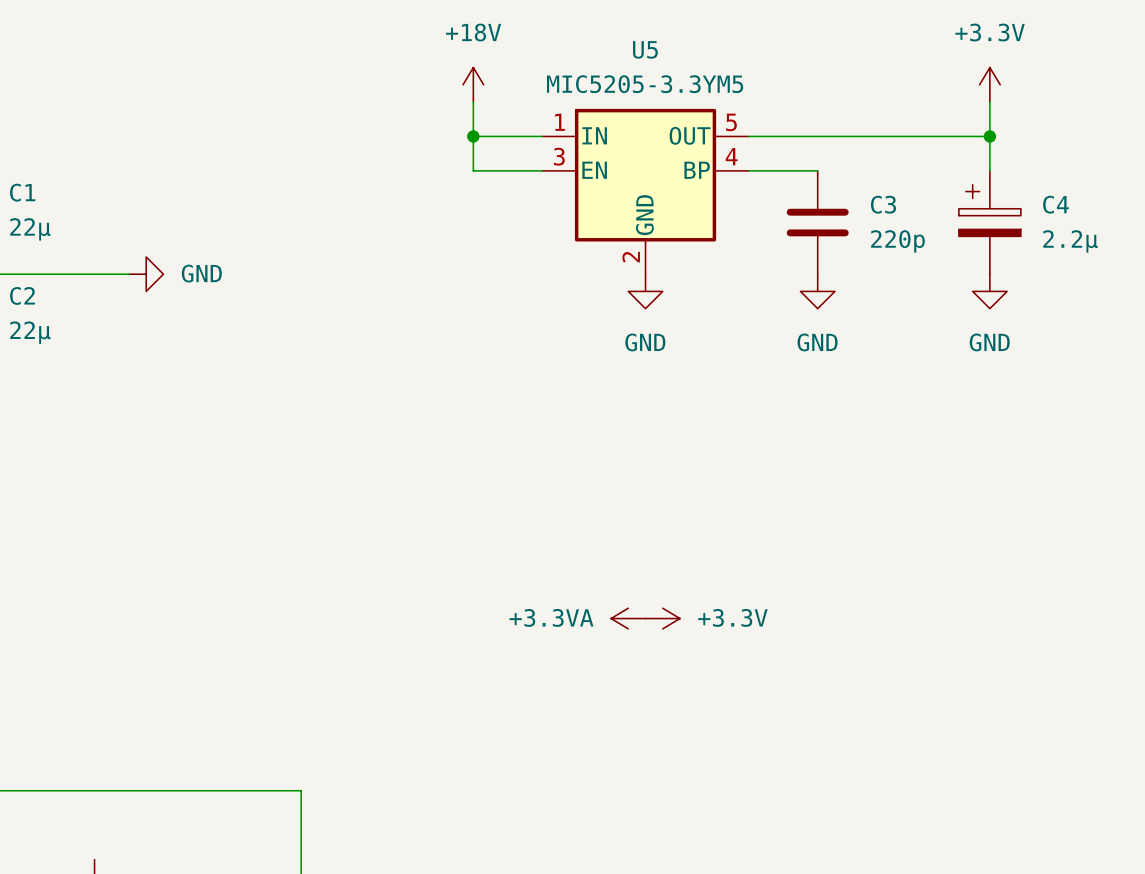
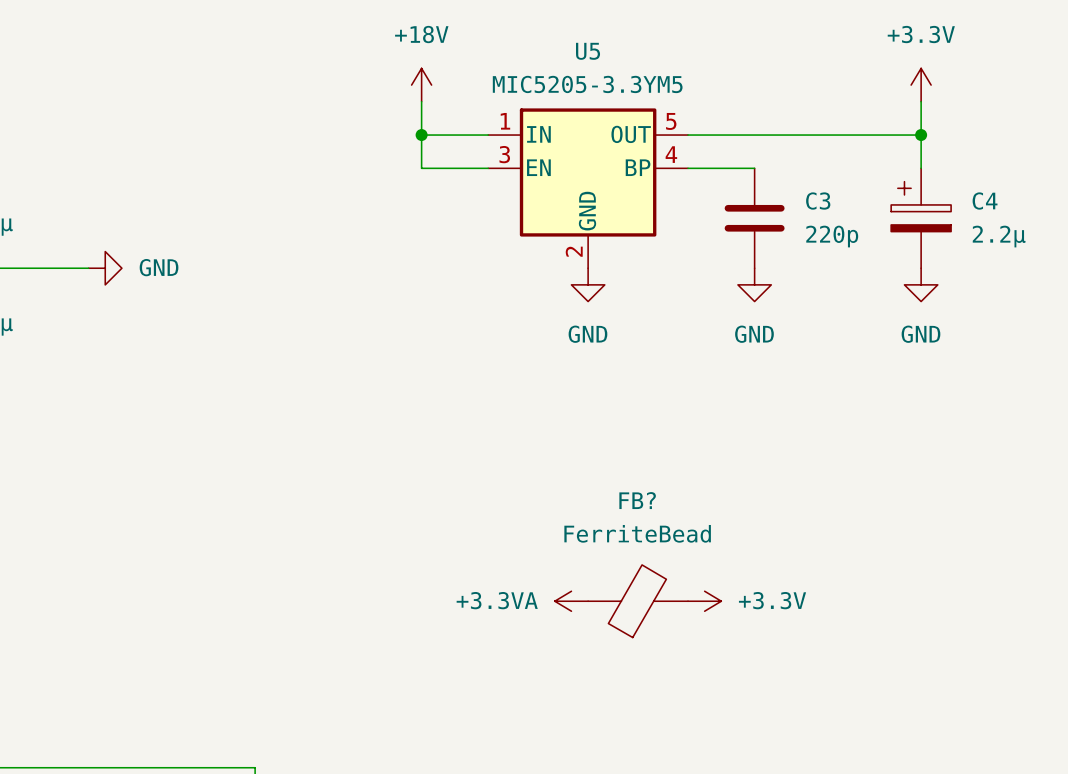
power symbol position: +3.3V (662, 618) -> +3.3V (704, 601)
FB?: none -> FerriteBead (638, 601)

